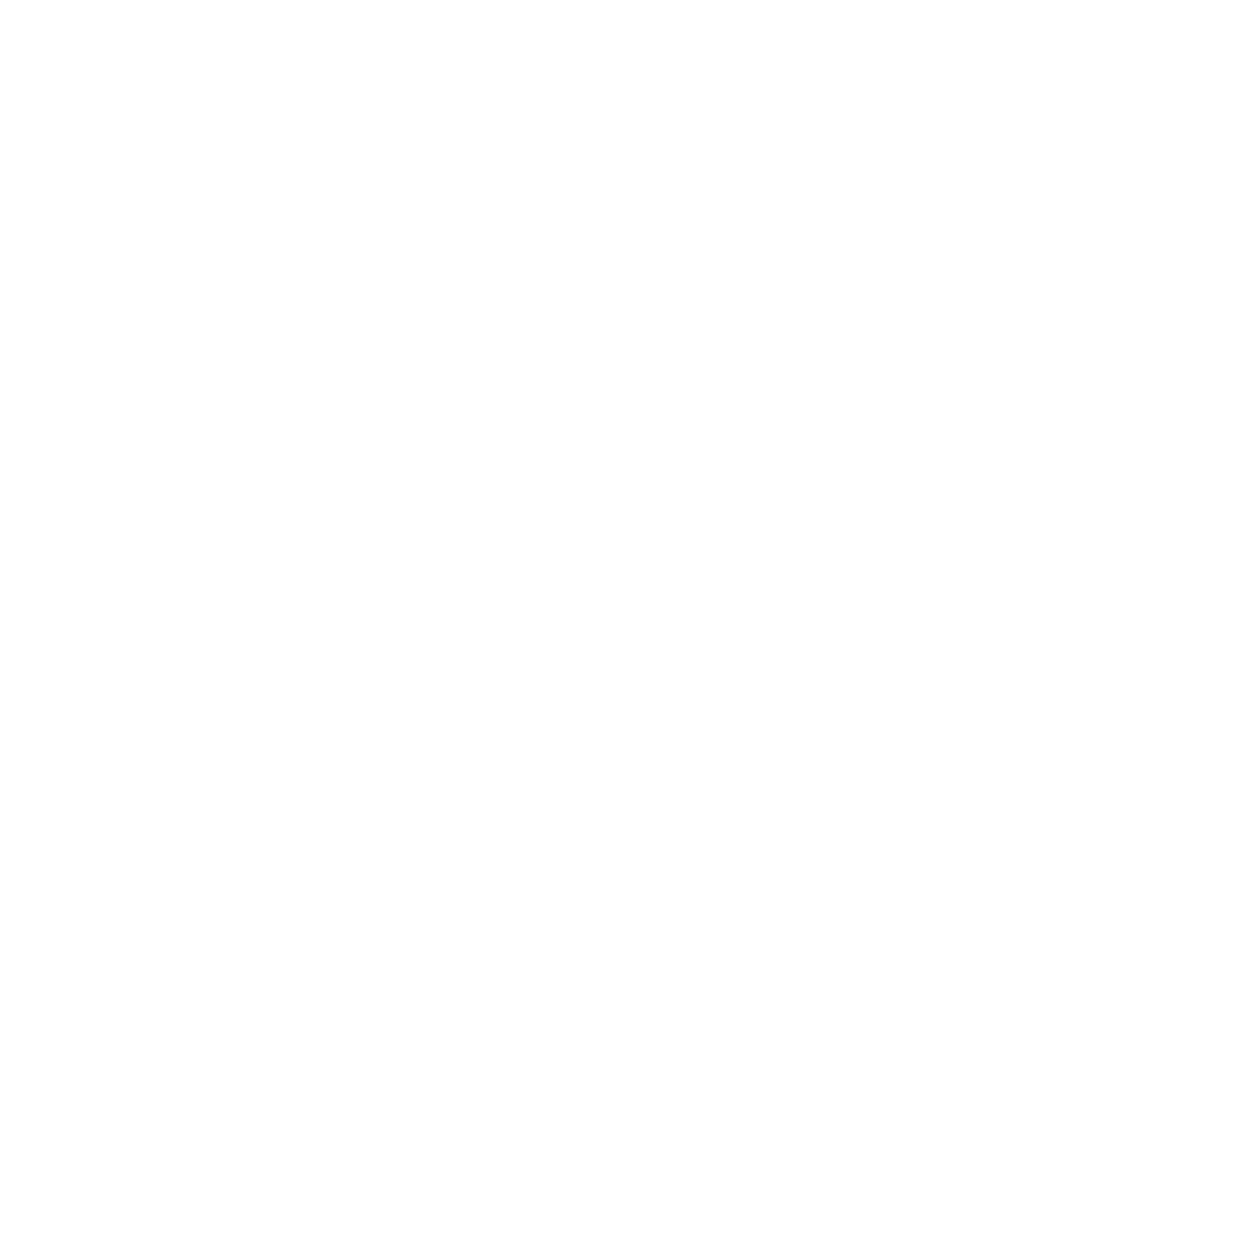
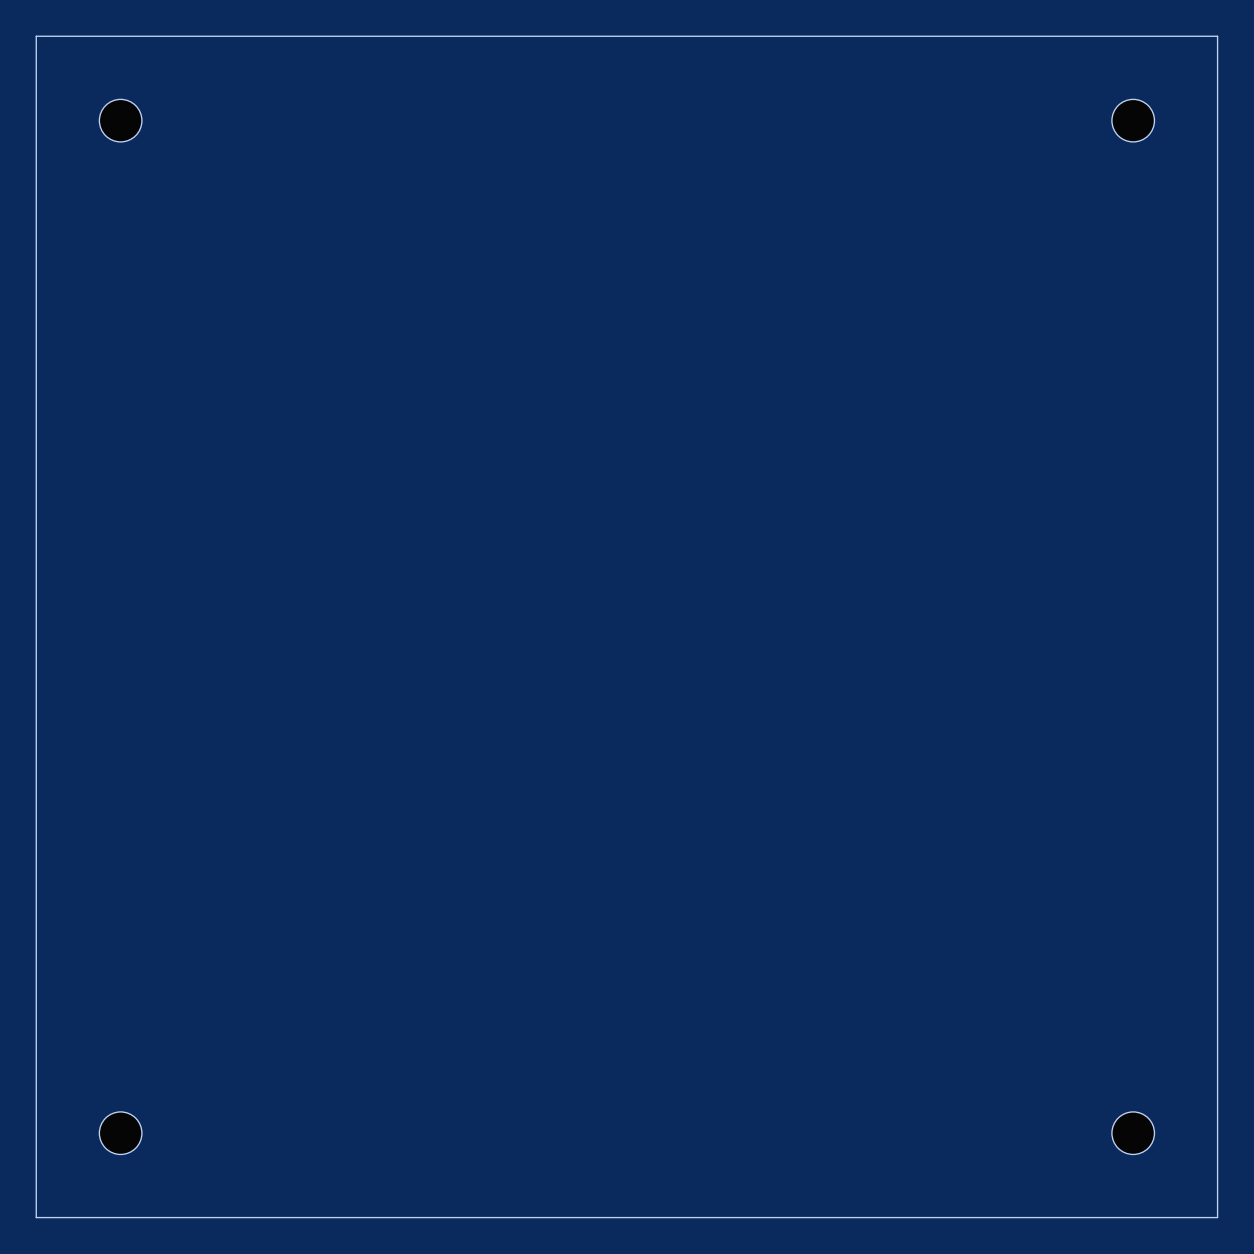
board edge: none -> (1217, 36) (36, 36) (36, 1217) (1217, 1217) (1217, 36)
part: none -> (120, 120)
part: none -> (1133, 120)
part: none -> (120, 1133)
part: none -> (1133, 1133)

